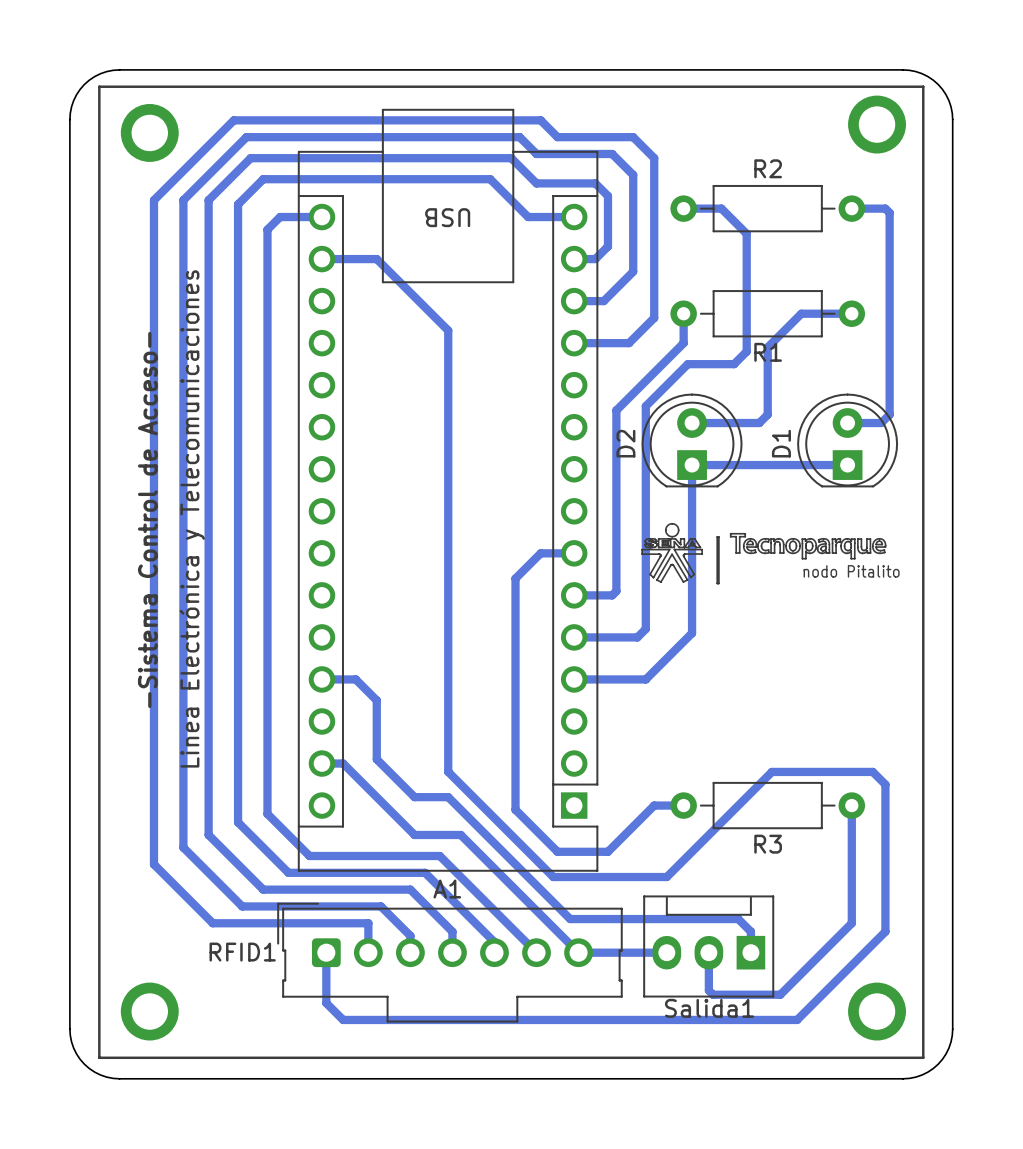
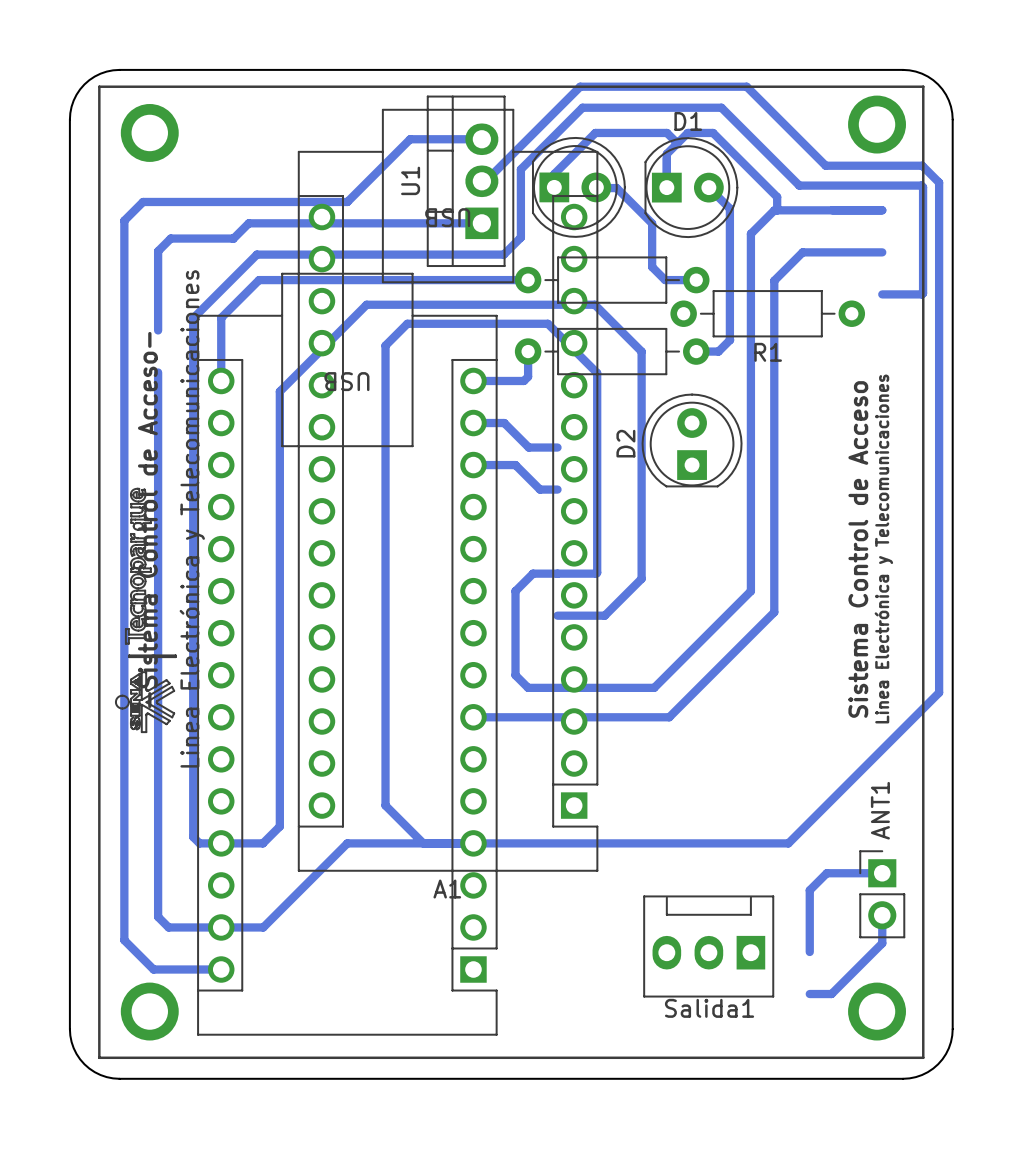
bottom track: none -> (478, 139) (410, 139) (347, 201) (143, 201) (124, 220) (124, 940) (153, 969) (221, 969)
bottom track: none -> (677, 143) (667, 132) (595, 132) (554, 174) (554, 187)
U1: none -> (466, 181)
bottom track: none -> (478, 181) (485, 181) (580, 86) (746, 86) (825, 165) (922, 165) (939, 182) (939, 692) (788, 843) (347, 843) (263, 927) (168, 927) (158, 916) (158, 372)
part: none -> (578, 187)
bottom track: none -> (596, 187) (616, 188) (652, 223) (652, 267) (665, 280) (696, 280)
bottom track: none -> (666, 187) (666, 153) (687, 132) (713, 132) (777, 197) (777, 210)
bottom track: none -> (708, 187) (729, 208) (729, 339)
bottom track: (683, 208) (721, 208) (746, 233) (746, 351) (734, 364) (687, 364) (645, 406) (645, 629) (637, 637) (574, 637) -> none
R2: (767, 208) -> none
bottom track: (851, 208) (885, 208) (889, 212) (889, 414) (881, 423) (847, 423) -> none
bottom track: (321, 217) (280, 217) (267, 229) (267, 813) (309, 856) (439, 856) (536, 952) -> none
bottom track: (574, 217) (528, 217) (490, 179) (263, 179) (238, 204) (238, 822) (288, 872) (425, 872) (494, 942) (494, 952) -> none
bottom track: none -> (478, 223) (248, 223) (233, 238) (170, 238) (158, 251) (158, 330)
bottom track: none -> (882, 252) (802, 252) (774, 280) (774, 612) (669, 717) (473, 717)
bottom track: (321, 259) (376, 259) (448, 330) (448, 771) (553, 877) (666, 877) (771, 771) (872, 771) (885, 784) (885, 931) (797, 1019) (343, 1019) (326, 1003) (326, 952) -> none
bottom track: (574, 259) (595, 259) (607, 246) (607, 196) (595, 183) (536, 183) (511, 158) (250, 158) (208, 200) (208, 834) (263, 889) (410, 889) (452, 931) (452, 952) -> none
bottom track: none -> (528, 280) (259, 280) (221, 317) (221, 380)
part: none -> (612, 280)
bottom track: none -> (882, 294) (923, 293) (923, 187) (921, 185) (799, 185) (721, 107) (582, 107) (520, 169) (520, 237) (503, 254) (256, 254) (193, 318) (193, 837) (199, 843) (262, 843) (279, 826) (279, 391) (366, 304) (594, 304) (641, 351) (641, 578) (604, 615) (557, 615)
bottom track: (574, 301) (603, 301) (633, 271) (633, 175) (612, 153) (536, 153) (519, 137) (246, 137) (183, 200) (183, 847) (242, 906) (380, 906) (410, 935) (410, 952) -> none
bottom track: (683, 313) (683, 343) (616, 410) (616, 591) (612, 595) (574, 595) -> none
bottom track: (851, 313) (801, 313) (767, 347) (767, 414) (759, 423) (692, 423) -> none
bottom track: none -> (730, 340) (718, 351) (696, 351)
bottom track: (574, 343) (629, 343) (654, 317) (654, 158) (633, 137) (557, 137) (540, 120) (233, 120) (153, 200) (153, 864) (212, 923) (368, 923) (368, 952) -> none
bottom track: none -> (528, 351) (528, 376) (523, 380) (473, 380)
part: none -> (612, 351)
bottom track: none -> (473, 423) (504, 423) (528, 447) (557, 447)
D1 rotation: 0° (847, 440) -> 90° clockwise (691, 187)
D1 position: (847, 440) -> (691, 187)
bottom track: none -> (473, 465) (515, 465) (540, 489) (557, 489)
bottom track: (847, 465) (692, 465) (692, 633) (645, 679) (574, 679) -> none
line: none -> (137, 488) (132, 490) (131, 496) (134, 500) (139, 501) (144, 498) (145, 491) (144, 489) (142, 490) (142, 495) (139, 498) (137, 488)
line: none -> (136, 492) (136, 498) (133, 494) (136, 492)
line: none -> (143, 507) (145, 506) (145, 503) (131, 503) (131, 507) (140, 507) (142, 510) (140, 512) (131, 512) (131, 516) (143, 515) (145, 511) (143, 507)
line: none -> (133, 522) (131, 522) (131, 519) (150, 519) (150, 523) (143, 523)
line: none -> (137, 523) (142, 524) (141, 528) (134, 528) (134, 524) (137, 523)
line: (672, 523) (667, 525) (665, 530) (667, 534) (672, 536) (676, 534) (678, 530) (676, 525) (672, 523) -> none
line: (730, 533) (745, 533) (745, 536) (739, 536) (739, 553) (736, 553) (736, 536) (730, 536) (730, 533) -> none
line: (717, 537) (718, 537) (718, 583) (717, 583) (717, 537) -> none
line: none -> (133, 538) (131, 533) (134, 533) (136, 538) (145, 538) (145, 541) (131, 541) (131, 538) (133, 538)
line: (658, 538) (668, 538) (668, 540) (662, 540) (668, 542) (668, 543) (662, 543) (662, 545) (669, 545) (669, 547) (658, 547) (658, 538) -> none
line: (670, 538) (675, 538) (680, 544) (680, 538) (684, 538) (684, 547) (679, 547) (674, 541) (674, 547) (670, 547) (670, 538) -> none
line: (690, 538) (694, 538) (700, 547) (695, 545) (684, 547) (690, 538) -> none
line: (750, 538) (755, 541) (756, 547) (747, 548) (750, 550) (755, 550) (754, 552) (747, 552) (743, 548) (745, 541) (750, 538) -> none
line: (765, 538) (769, 539) (768, 542) (762, 542) (761, 547) (764, 550) (768, 549) (769, 552) (764, 553) (759, 550) (757, 545) (760, 540) (765, 538) -> none
line: (793, 538) (787, 540) (785, 546) (787, 551) (792, 553) (798, 551) (800, 545) (798, 540) (793, 538) -> none
line: (839, 538) (840, 542) (836, 544) (836, 553) (832, 553) (832, 539) (835, 539) (835, 541) (839, 538) -> none
line: (879, 538) (884, 541) (885, 547) (876, 548) (879, 550) (884, 550) (883, 552) (876, 552) (873, 548) (874, 541) (879, 538) -> none
line: (857, 539) (861, 539) (861, 548) (864, 550) (866, 548) (866, 539) (870, 539) (870, 553) (867, 553) (867, 550) (863, 553) (859, 552) (857, 539) -> none
line: (692, 540) (694, 544) (690, 544) (692, 540) -> none
line: (851, 540) (848, 538) (843, 539) (841, 547) (845, 553) (851, 551) (851, 558) (854, 558) (854, 539) (851, 539) (851, 540) -> none
line: (656, 541) (654, 539) (647, 539) (645, 542) (653, 545) (645, 544) -> none
line: (656, 541) (649, 540) (656, 543) (654, 547) (647, 547) (645, 544) -> none
line: (750, 541) (748, 542) (747, 544) (753, 544) (750, 541) -> none
line: (774, 541) (774, 539) (770, 539) (771, 553) (774, 553) (774, 543) (777, 541) (780, 543) (780, 553) (783, 553) (782, 540) (778, 538) (774, 541) -> none
line: (793, 541) (789, 546) (793, 550) (796, 546) (793, 541) -> none
line: (809, 541) (805, 545) (806, 548) (809, 550) (812, 546) (809, 541) -> none
line: (848, 541) (850, 543) (851, 547) (848, 550) (844, 546) (848, 541) -> none
line: (879, 541) (877, 542) (876, 544) (882, 544) (879, 541) -> none
line: (825, 543) (823, 541) (819, 542) (818, 540) (824, 538) (828, 541) (829, 553) (826, 551) -> none
line: (825, 543) (819, 545) (817, 549) (820, 553) (826, 551) -> none
line: (825, 546) (825, 550) (821, 550) (821, 547) (825, 546) -> none
line: none -> (135, 548) (133, 550) (134, 555) (132, 555) (130, 549) (132, 546) (145, 544) (144, 555) (138, 555) (136, 548)
line: none -> (138, 548) (142, 549) (142, 552) (139, 552) (138, 548)
line: (642, 549) (669, 549) (653, 577) (650, 574) (660, 555) (642, 554) (642, 549) -> none
line: (674, 549) (702, 549) (702, 554) (683, 554) (694, 574) (690, 577) (674, 549) -> none
text: none -> Sistema Control de Acceso (858, 549)
text: none -> Linea Electrónica y Telecomunicaciones (883, 549)
line: (805, 551) (805, 558) (802, 558) (802, 539) (805, 539) (805, 541) (808, 538) (813, 539) (816, 544) (815, 550) (810, 553) (805, 551) -> none
bottom track: (574, 553) (540, 553) (515, 578) (515, 591) -> (423, 843) (385, 805) (385, 345) (407, 323) (547, 323) (597, 373) (597, 572) (533, 573) (515, 591)
line: (672, 554) (687, 579) (683, 582) (672, 564) (660, 582) (656, 580) (672, 554) -> none
line: none -> (138, 558) (144, 561) (143, 568) (150, 568) (150, 571) (131, 572) (131, 568) (133, 568) (131, 561) (138, 558)
line: none -> (138, 561) (142, 564) (140, 568) (133, 566) (134, 563) (138, 561)
text: nodo Pitalito (851, 571) -> none
line: none -> (138, 574) (132, 576) (130, 581) (133, 586) (139, 588) (144, 585) (145, 580) (143, 575) (138, 574)
line: none -> (138, 577) (134, 579) (133, 582) (140, 584) (142, 580) (138, 577)
line: none -> (133, 600) (130, 596) (132, 591) (145, 590) (145, 594) (135, 594) (133, 596) (136, 599) (145, 599) (145, 603) (131, 603) (131, 600) (133, 600)
line: none -> (131, 605) (134, 605) (134, 611) (138, 612) (141, 611) (142, 605) (144, 605) (144, 613) (139, 616) (134, 615) (131, 611) (131, 605)
line: none -> (137, 617) (132, 619) (131, 625) (134, 629) (139, 630) (144, 627) (145, 621) (144, 618) (142, 619) (142, 624) (139, 627) (137, 617)
line: none -> (136, 621) (136, 627) (133, 624) (136, 621)
line: none -> (125, 629) (128, 629) (128, 634) (145, 634) (145, 638) (128, 638) (128, 643) (125, 643) (125, 629)
part: none -> (347, 654)
line: none -> (129, 655) (129, 657) (175, 657) (175, 655) (129, 655)
line: none -> (141, 672) (146, 672) (147, 690) (166, 680) (169, 683) (141, 699) (141, 672)
line: none -> (139, 673) (131, 679) (131, 683) (139, 689) (138, 684) (139, 673)
bottom track: (515, 675) (515, 809) (557, 851) (607, 851) (654, 805) (683, 805) -> (515, 675) (528, 687) (654, 687) (750, 591) (750, 233) (774, 210) (882, 210)
bottom track: (321, 679) (355, 679) (376, 700) (376, 759) (414, 797) (448, 797) (570, 919) (738, 919) (750, 931) (750, 952) -> none
line: none -> (136, 680) (133, 681) (136, 683) (136, 680)
line: none -> (172, 686) (174, 690) (156, 702) (174, 713) (172, 717) (146, 702) (172, 686)
line: none -> (131, 689) (139, 689) (139, 694) (133, 700) (139, 700) (139, 703) (131, 703) (131, 698) (136, 693) (131, 693) (131, 689)
line: none -> (122, 695) (117, 697) (115, 702) (117, 706) (122, 708) (126, 706) (128, 702) (126, 697) (122, 695)
line: none -> (141, 704) (169, 720) (166, 724) (147, 713) (146, 732) (141, 732) (141, 704)
line: none -> (137, 705) (139, 705) (139, 715) (131, 715) (131, 705) (132, 705) (132, 711) (134, 705) (136, 705) (136, 711) (137, 711) (137, 705)
line: none -> (133, 717) (131, 720) (131, 726) (134, 728) (137, 721) (136, 729)
line: none -> (133, 721) (133, 725) (135, 717) (139, 718) (139, 726) (136, 729)
bottom track: (321, 763) (343, 763) (414, 834) (460, 834) (578, 952) (666, 952) -> none
R3: (767, 805) -> none
bottom track: (851, 805) (851, 923) (780, 994) (713, 994) (708, 990) (708, 952) -> none
bottom track: none -> (882, 873) (826, 873) (809, 890) (809, 951)
ANT1: none -> (882, 894)
bottom track: none -> (882, 915) (882, 943) (831, 994) (809, 994)
RFID1: (449, 962) -> none

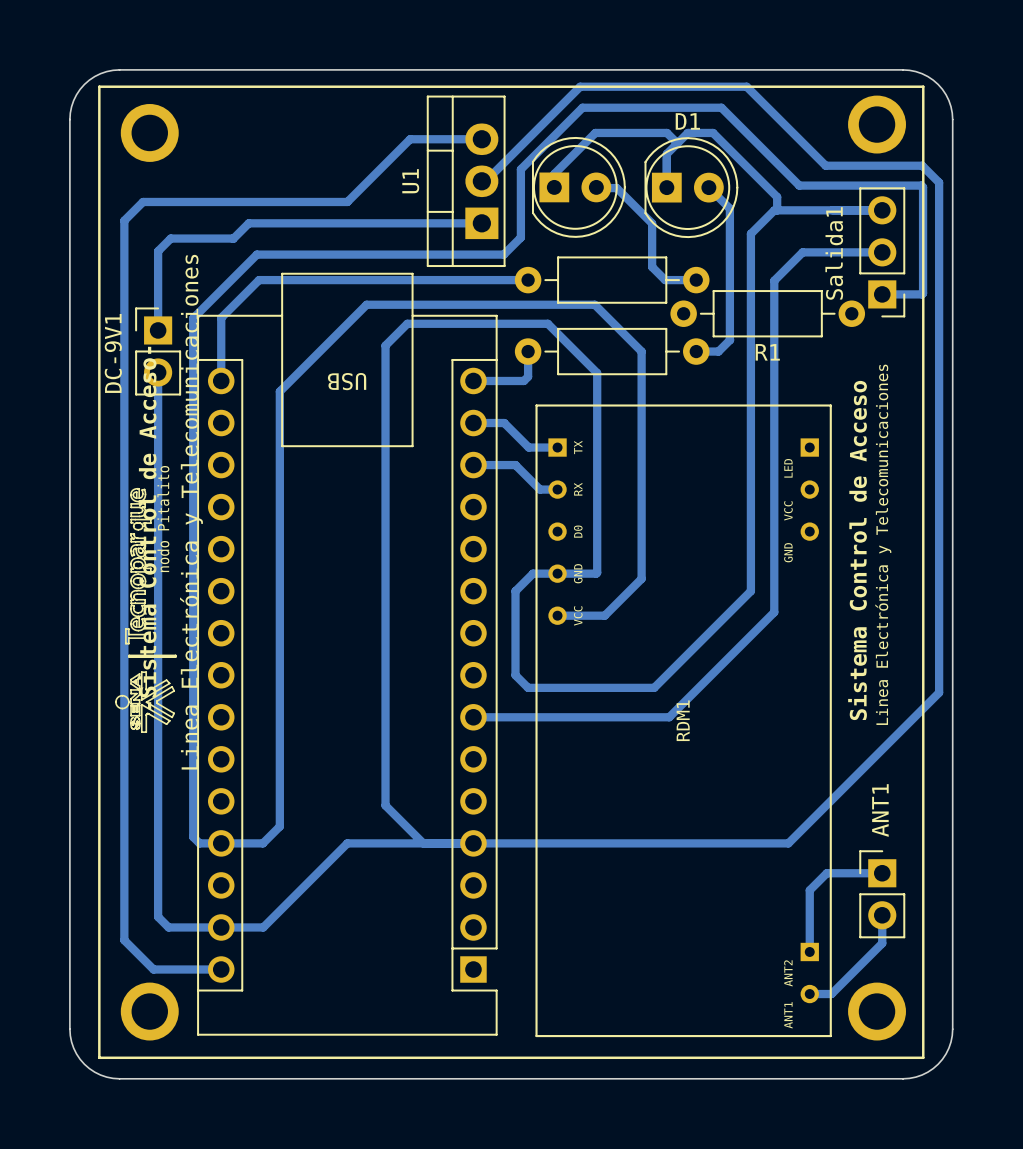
DC-9V1: none -> (158, 351)
D2: (692, 440) -> none
A1: (448, 490) -> none
text: none -> nodo Pitalito (163, 519)
RDM1: none -> (683, 720)
Salida1 footprint: [643, 895, 775, 998] -> [859, 187, 906, 318]
Salida1 name position: Salida1 (709, 1008) -> Salida1 (834, 253)

